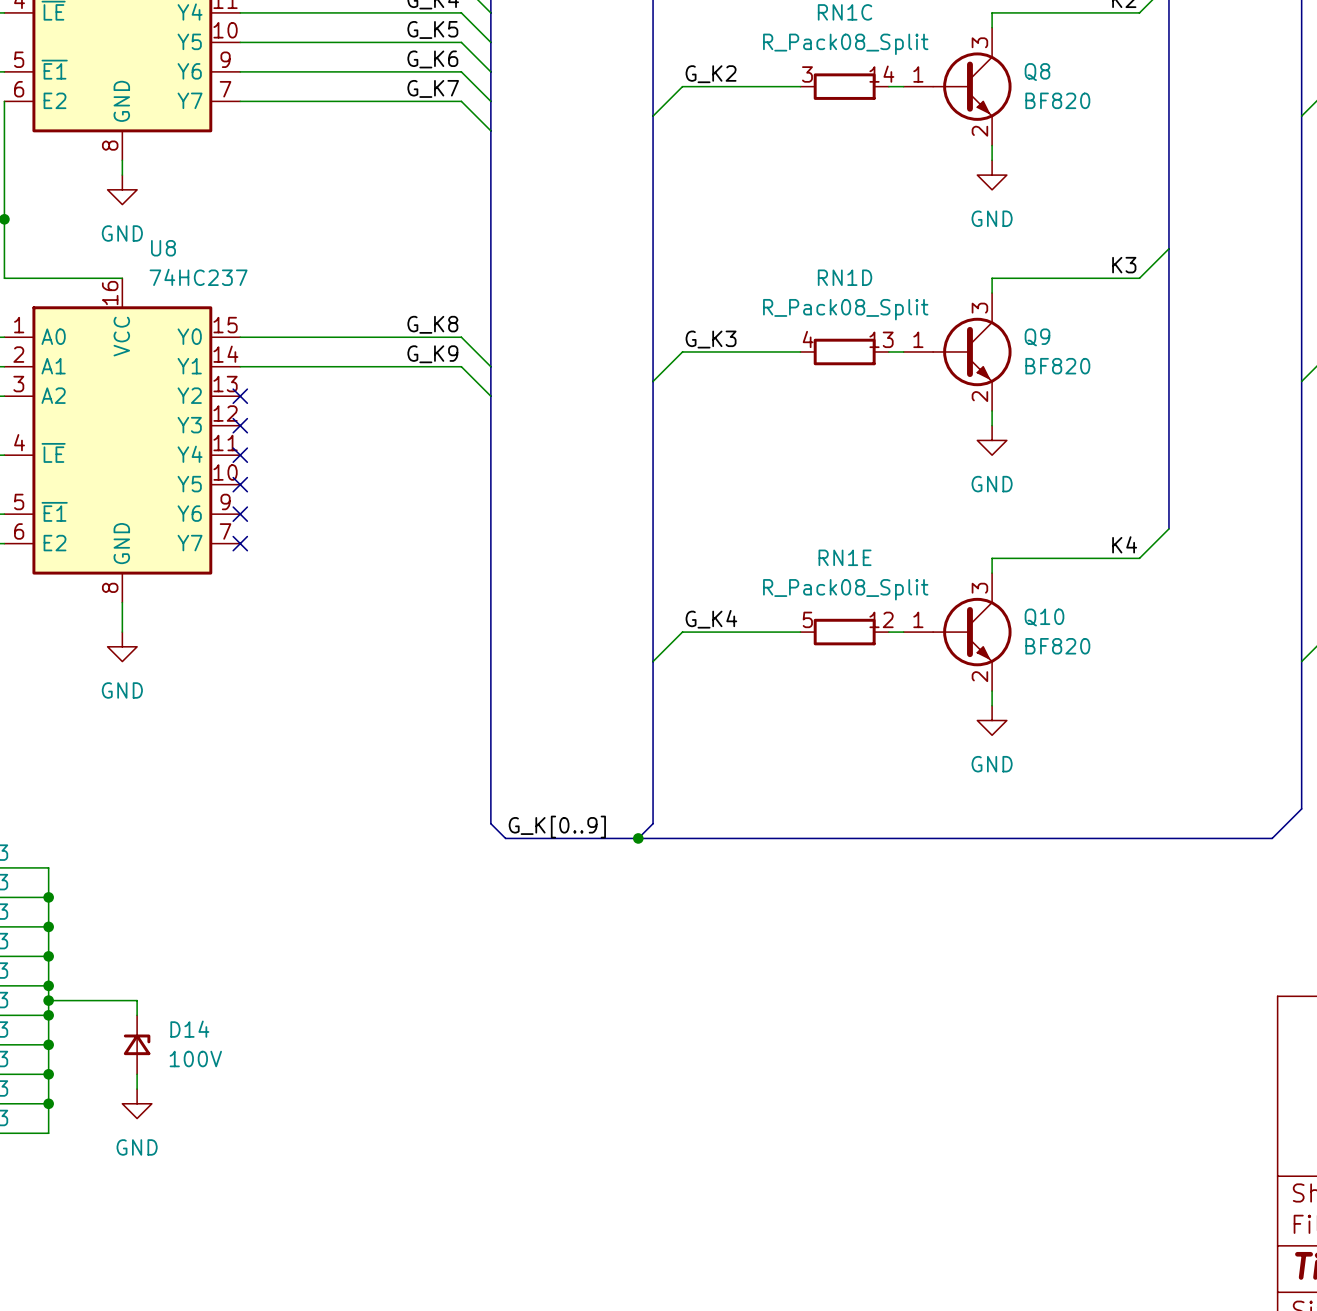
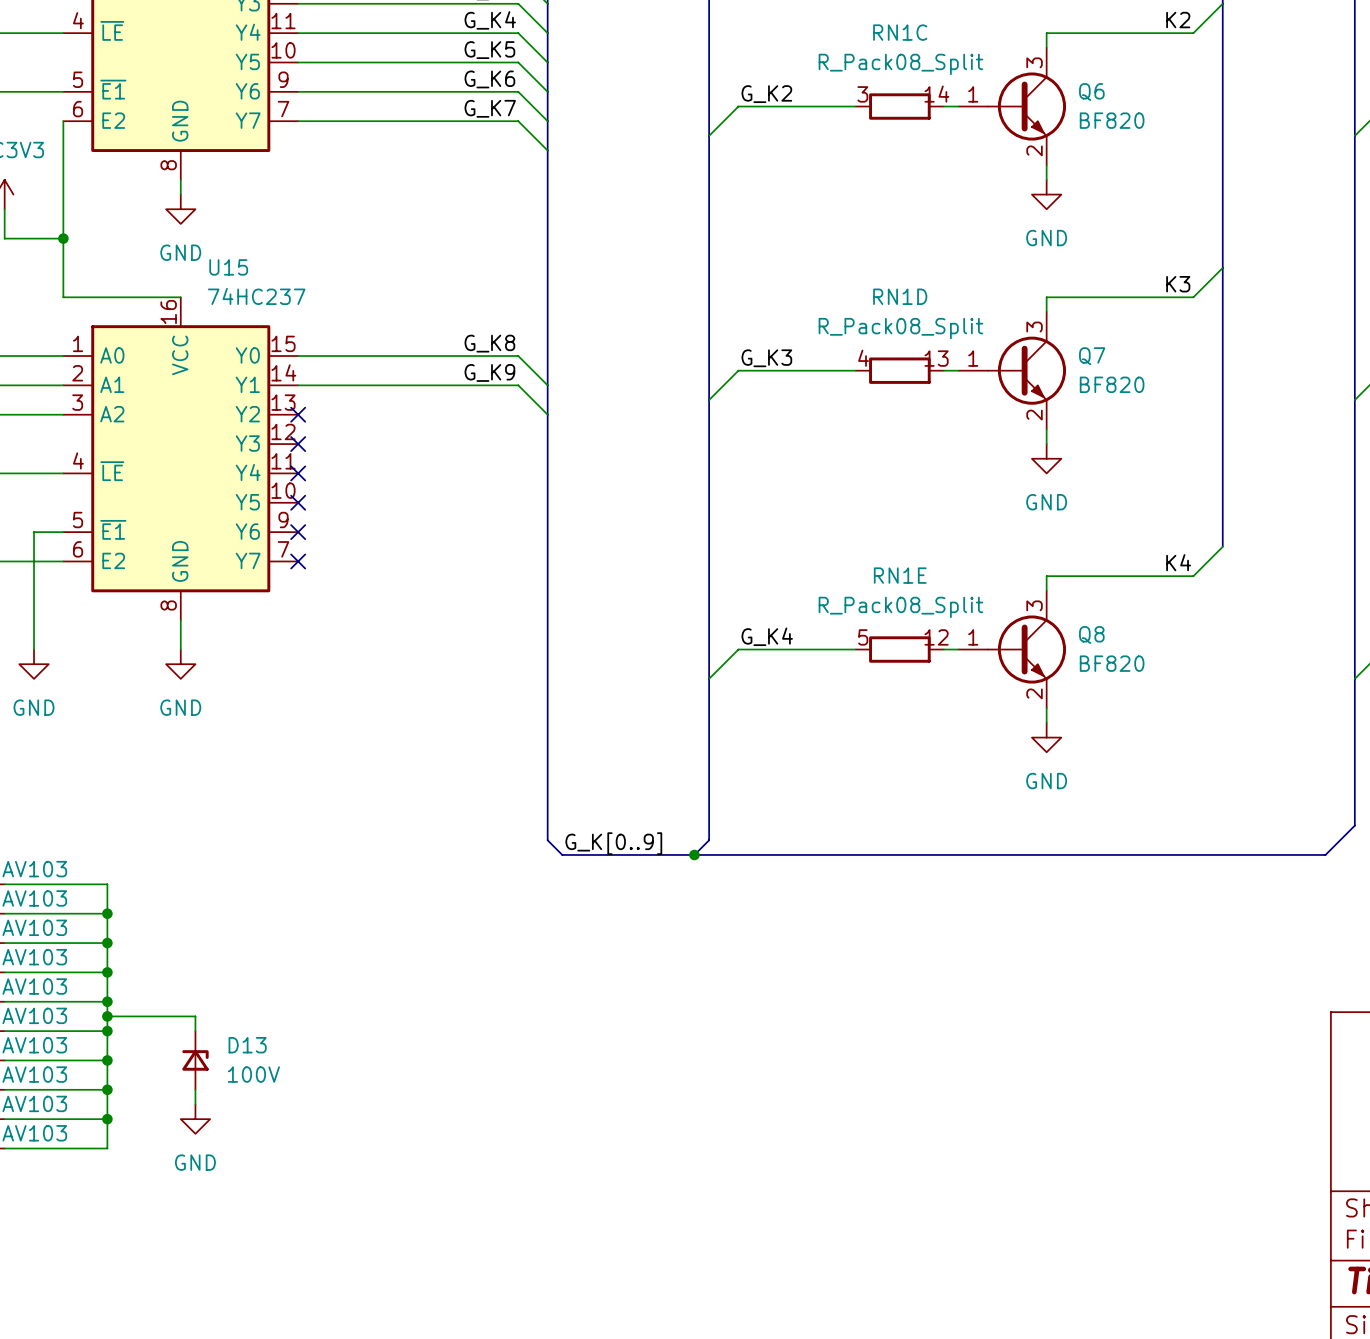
Q8 name: Q8 (1037, 72) -> Q6 (1091, 91)
U8 name: U8 (163, 248) -> U15 (228, 267)
Q9 name: Q9 (1037, 337) -> Q7 (1092, 356)
Q10 name: Q10 (1044, 617) -> Q8 (1091, 635)
D14 name: D14 (189, 1029) -> D13 (247, 1045)

